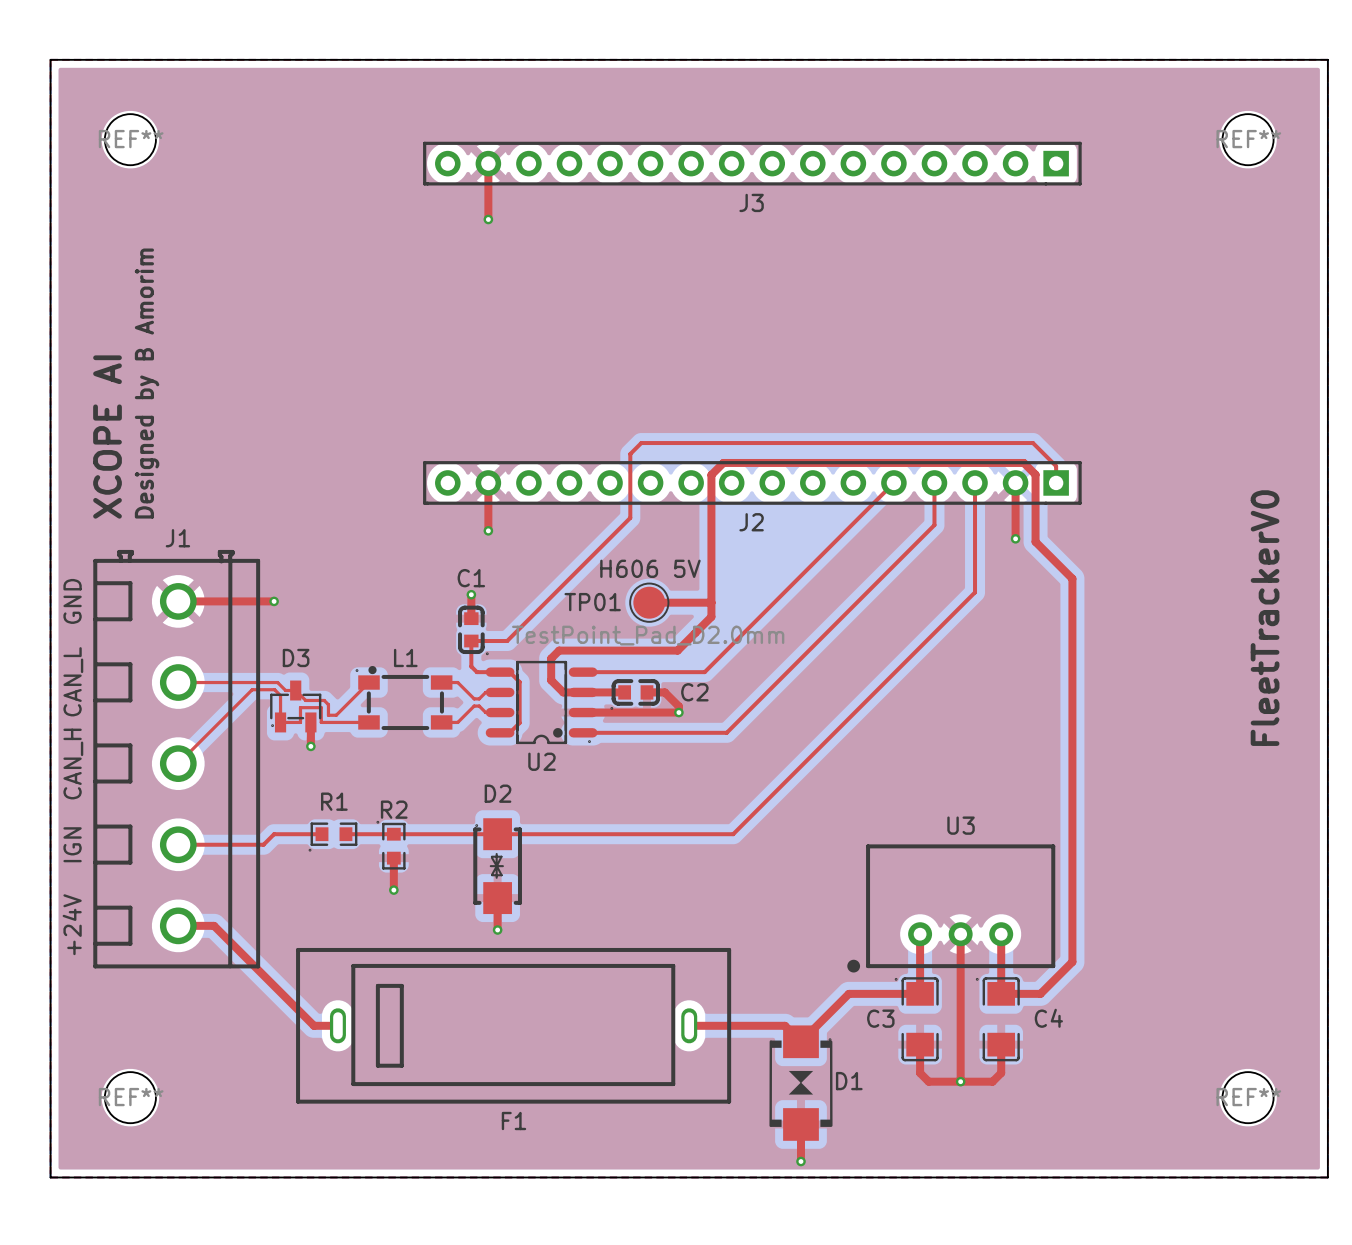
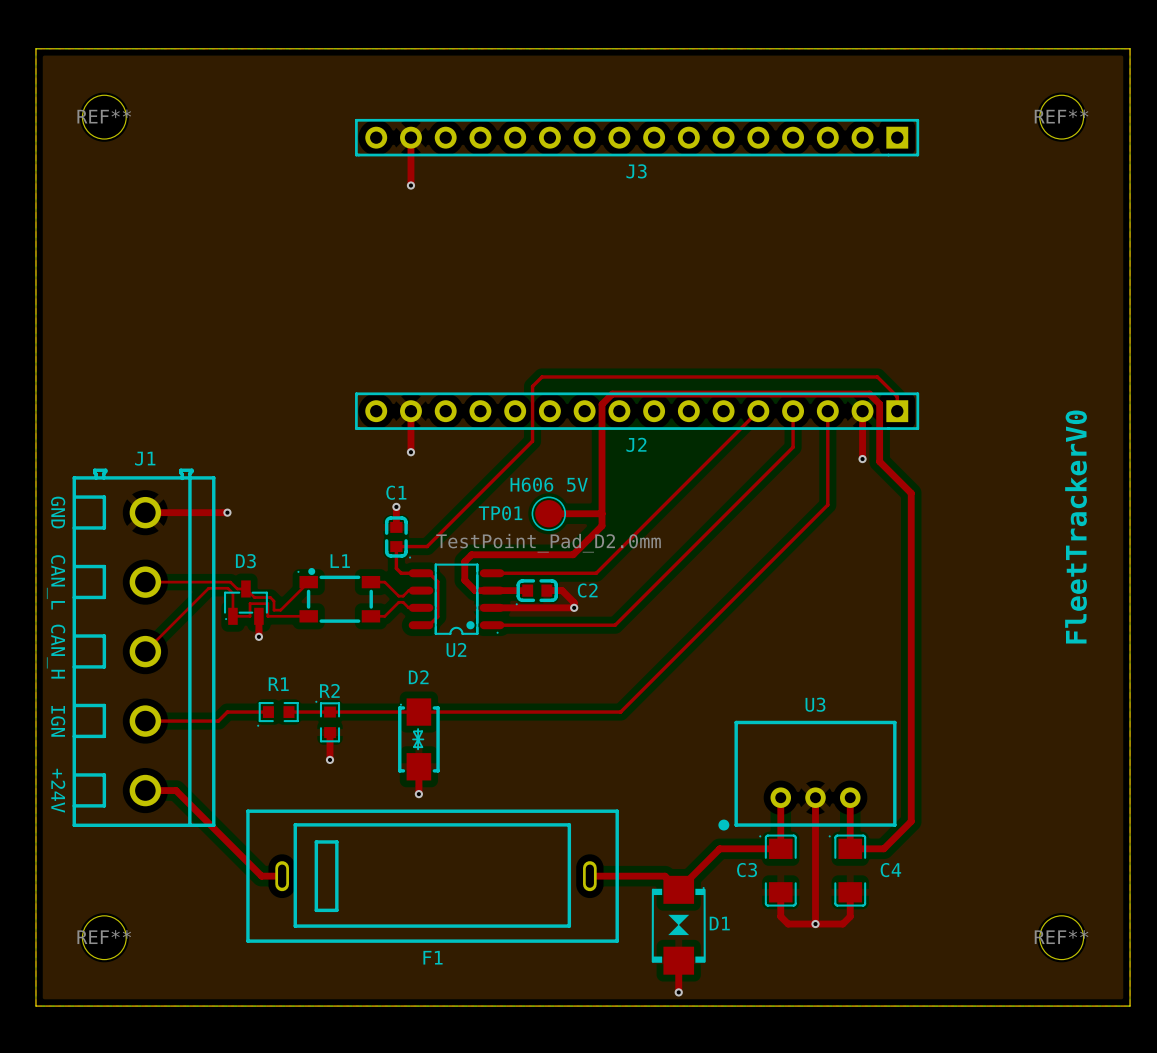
text: Designed by B Amorim (147, 383) -> none
text: XCOPE AI (107, 437) -> none
text rotation: 0° (72, 601) -> 180° (58, 512)
text rotation: 0° (73, 681) -> 180° (56, 582)
text rotation: 0° (73, 764) -> 180° (56, 651)
text rotation: 0° (72, 844) -> 180° (58, 721)
text rotation: 0° (72, 924) -> 180° (58, 790)
F1 footprint: [296, 947, 732, 1104] -> [246, 809, 619, 943]

